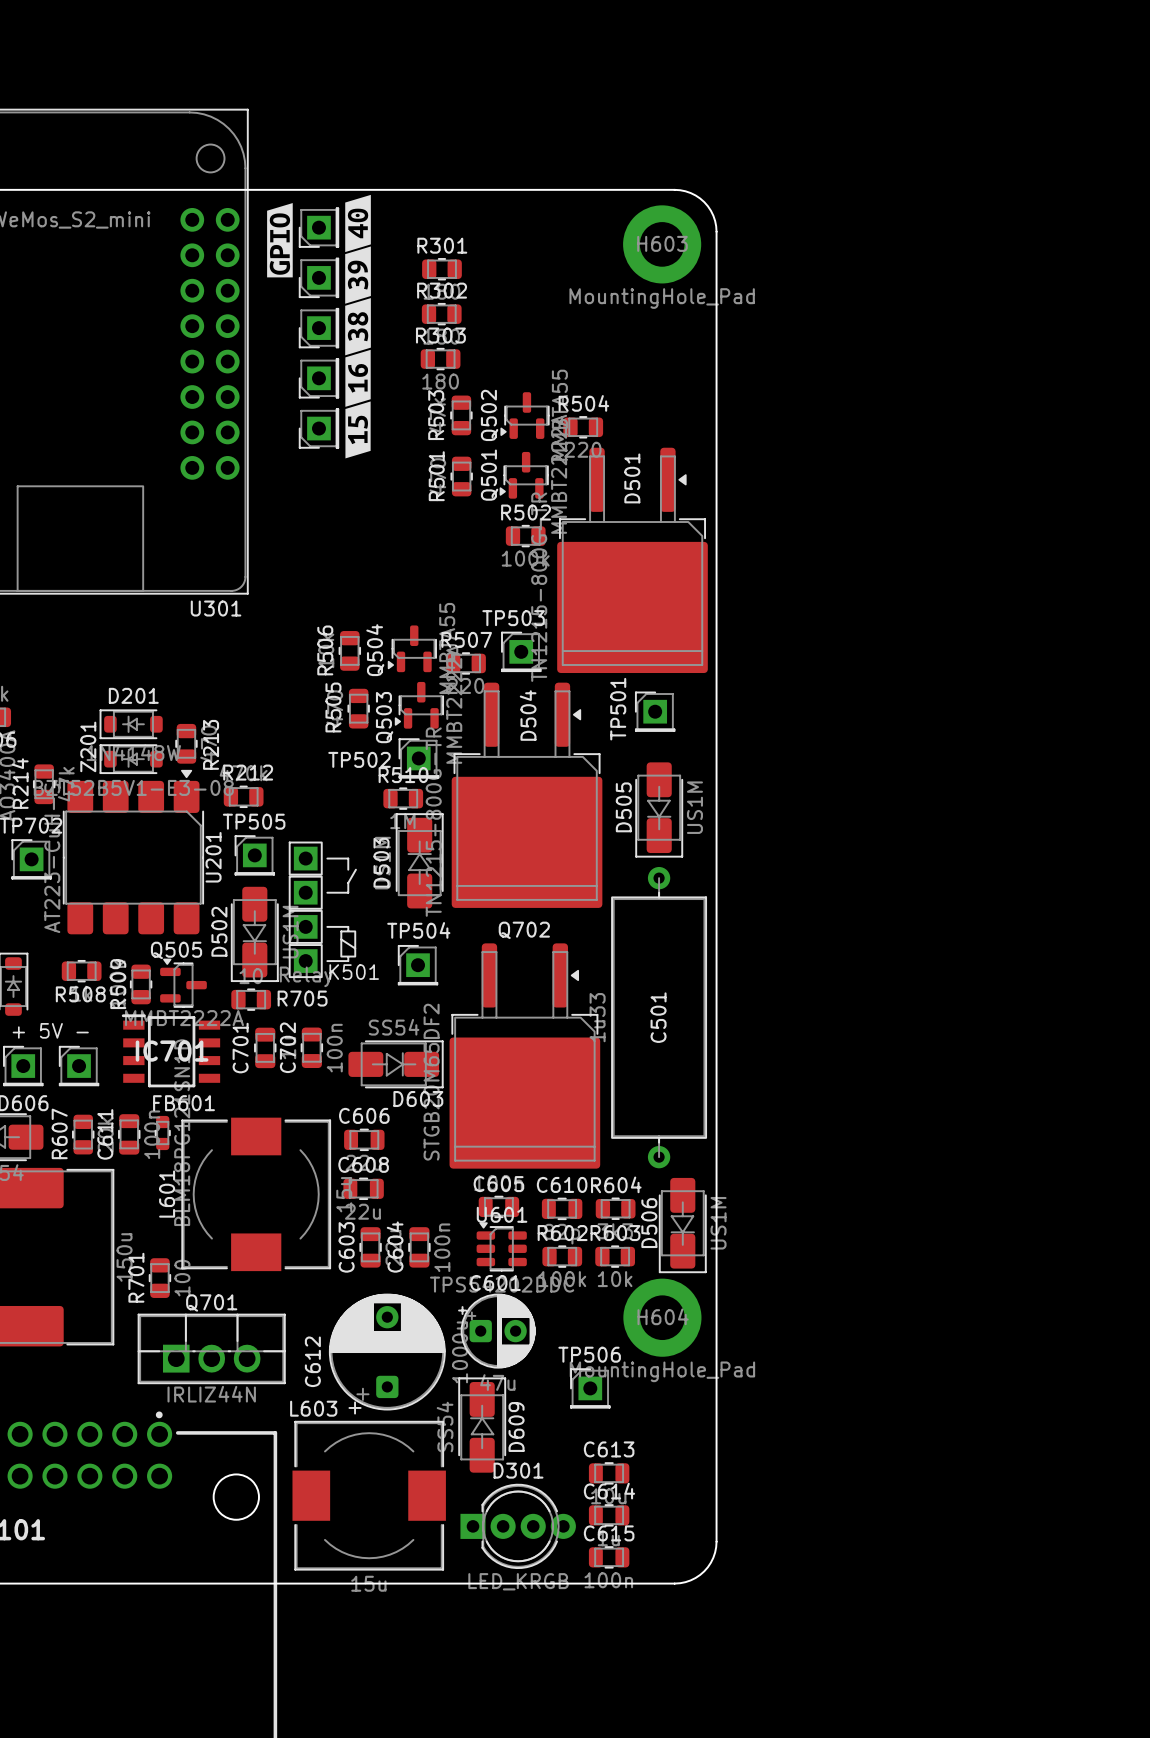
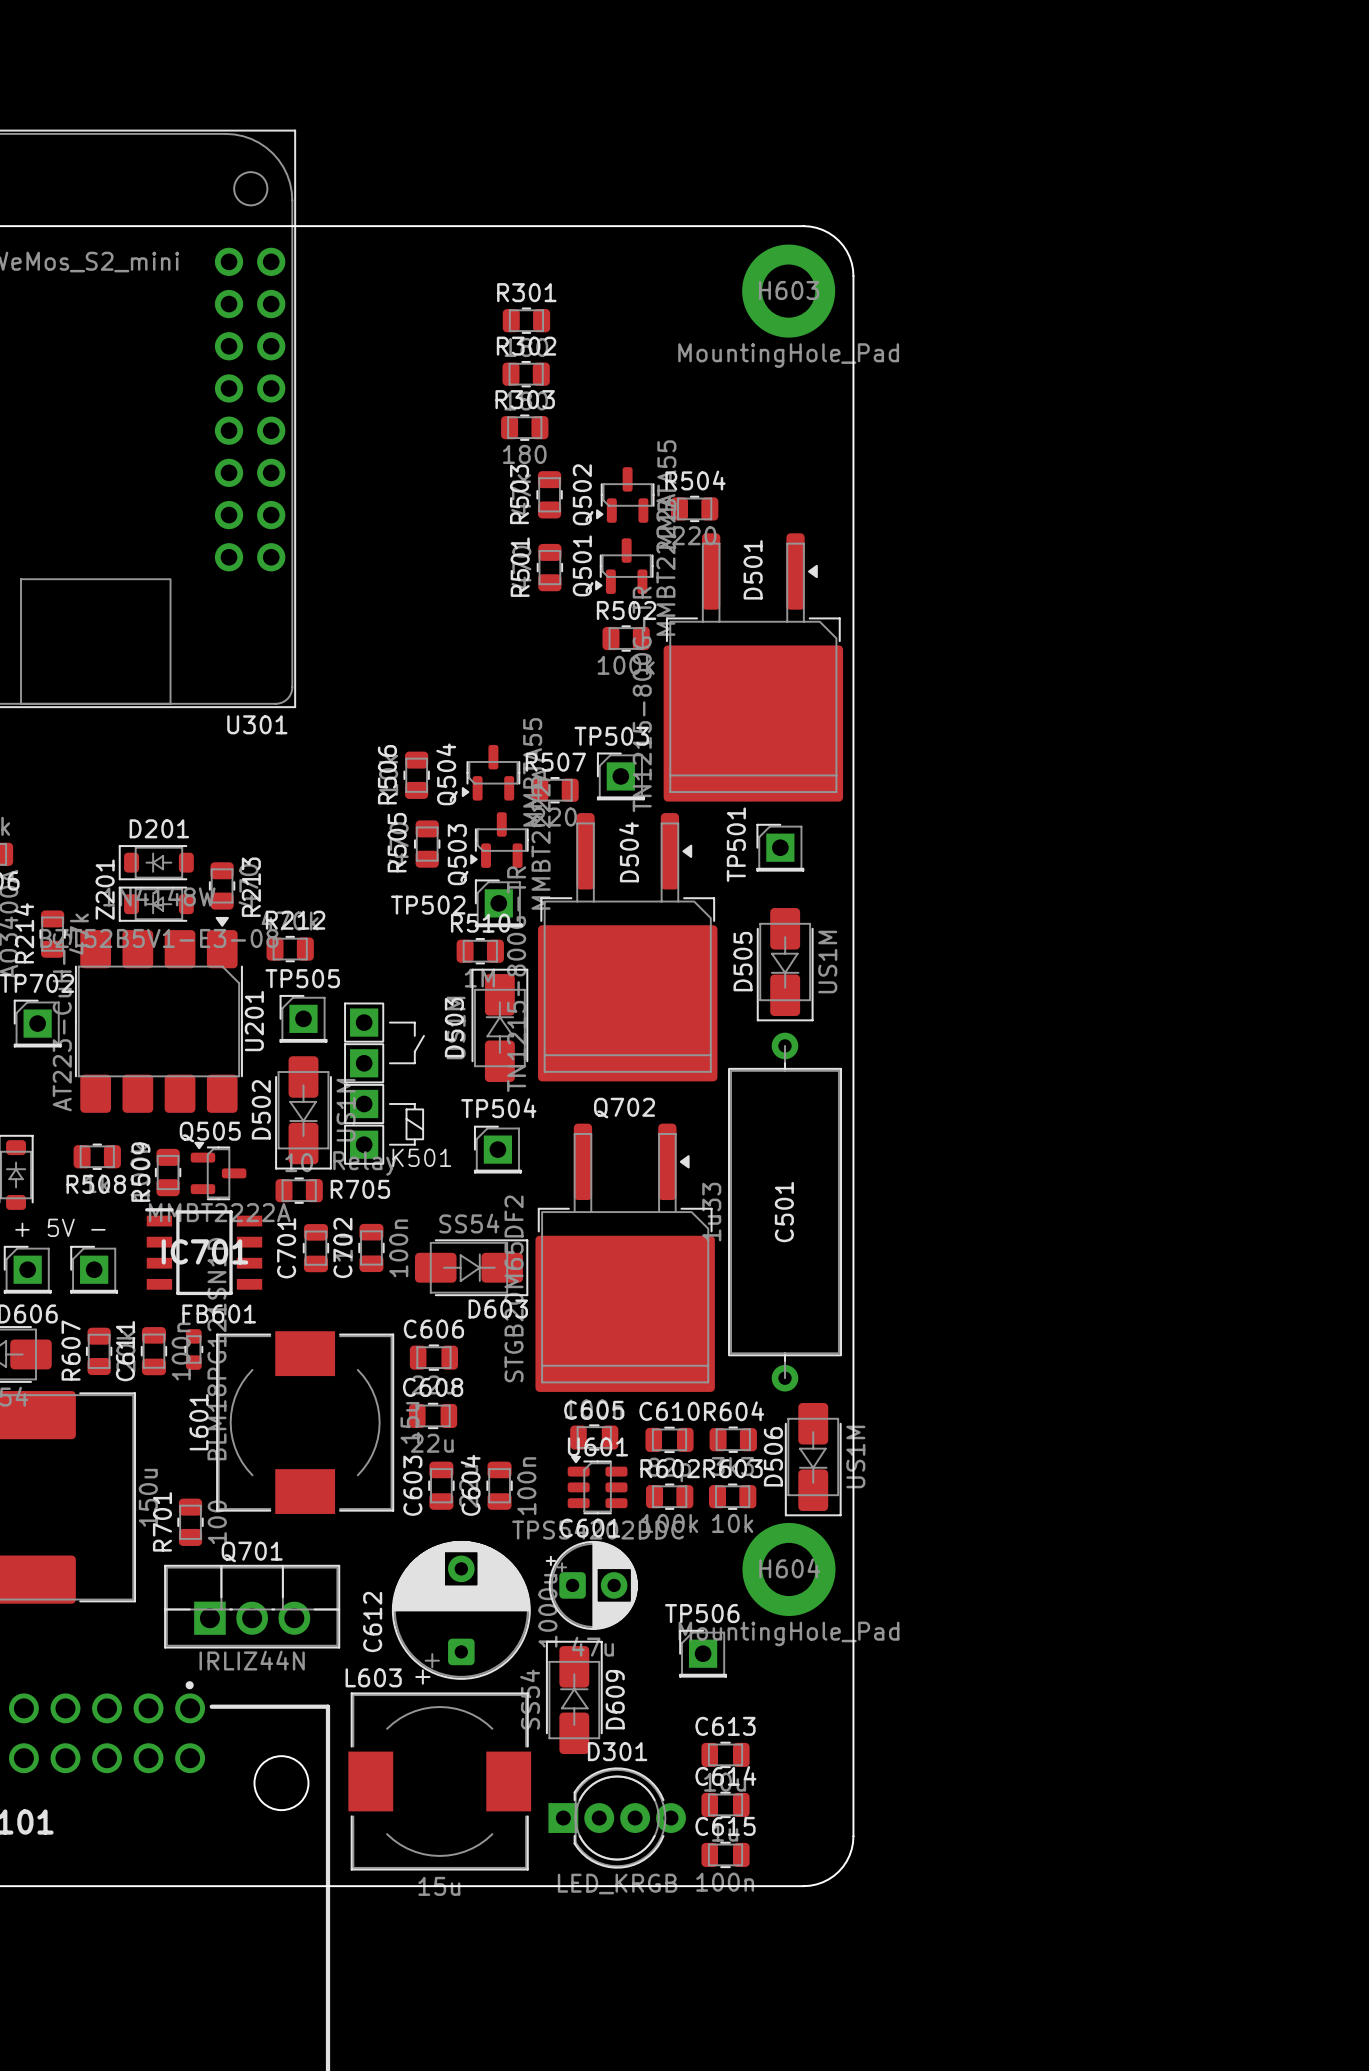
drawing: [345, 194, 371, 459] -> none
drawing: [267, 203, 293, 278] -> none
part: (318, 227) -> none
part: (318, 277) -> none
part: (318, 328) -> none
part: (318, 378) -> none
part: (318, 428) -> none

